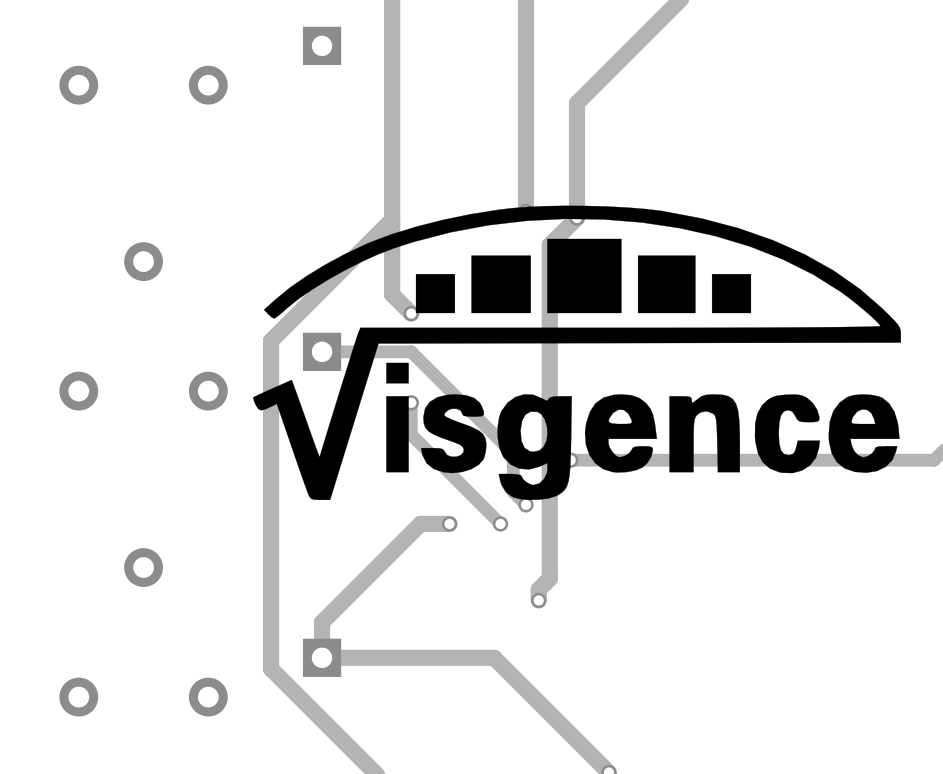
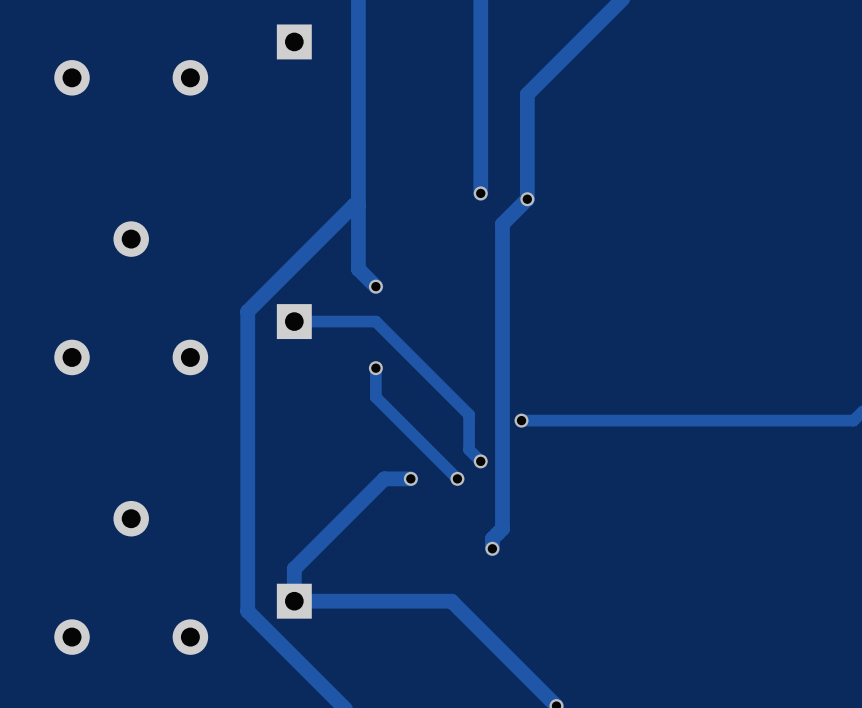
drawing: [253, 205, 901, 501] -> none

